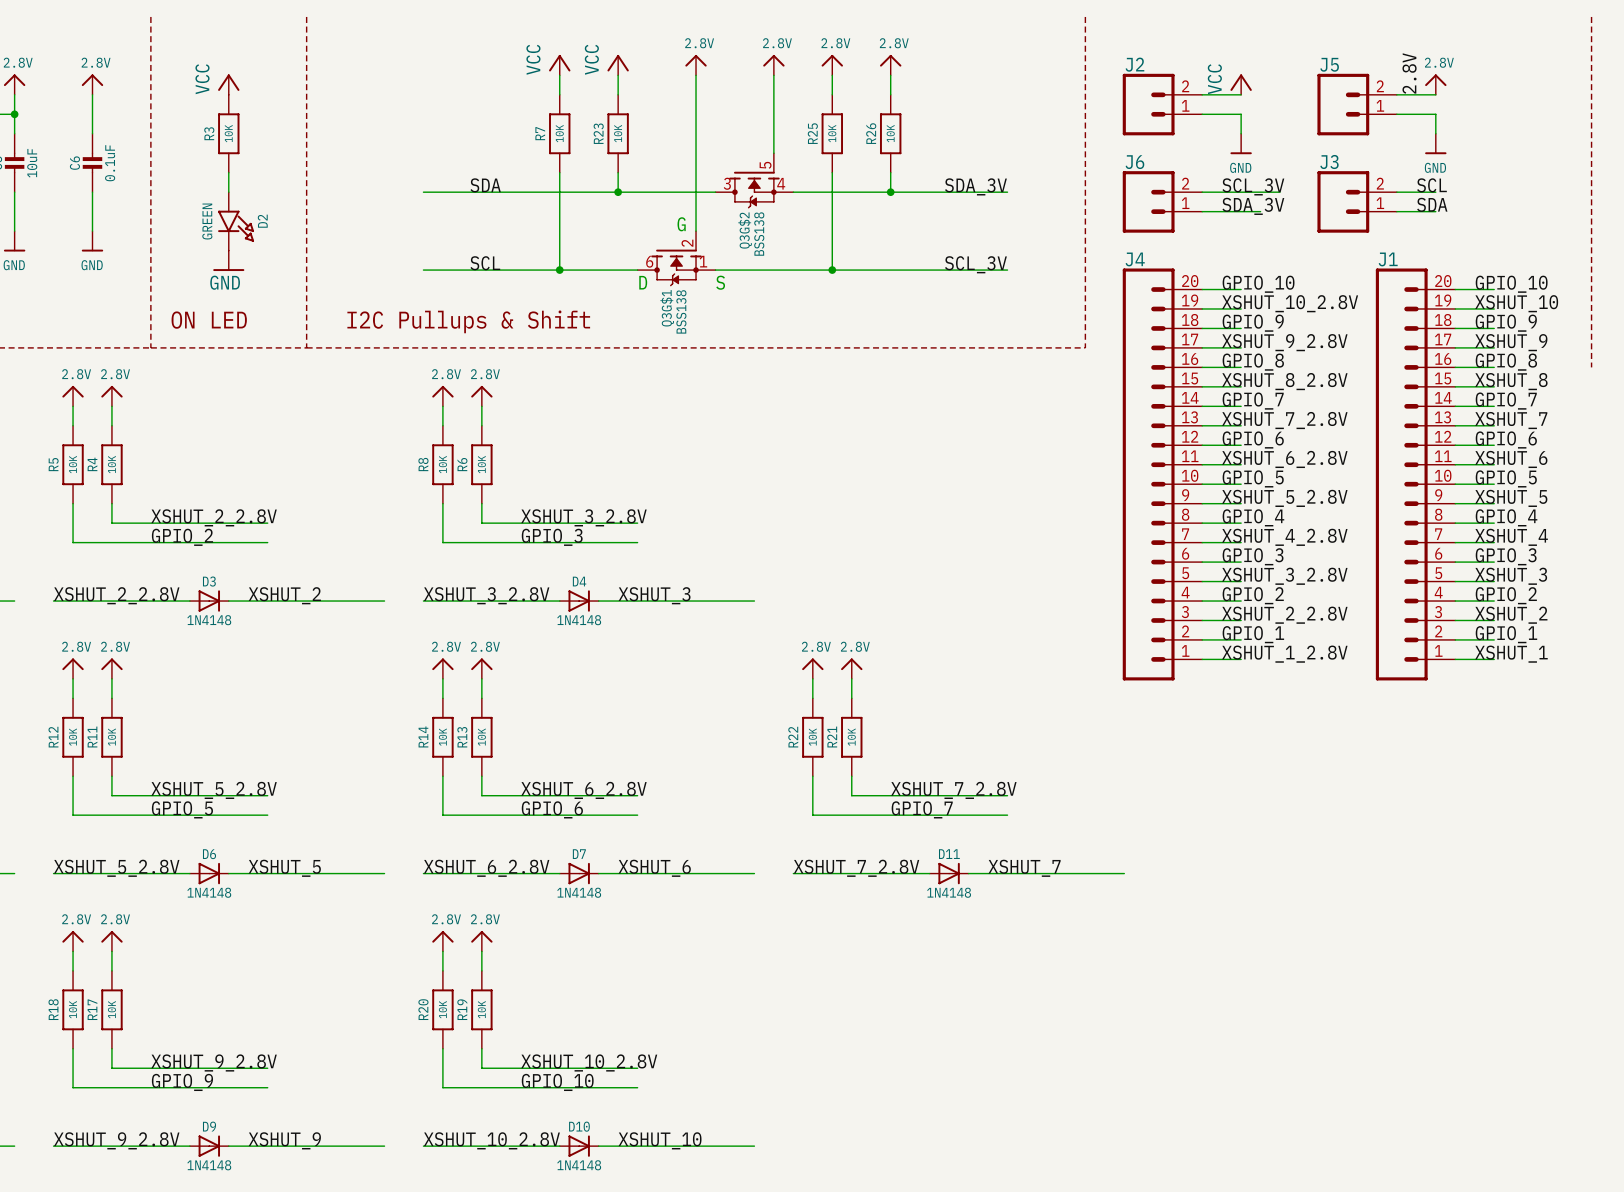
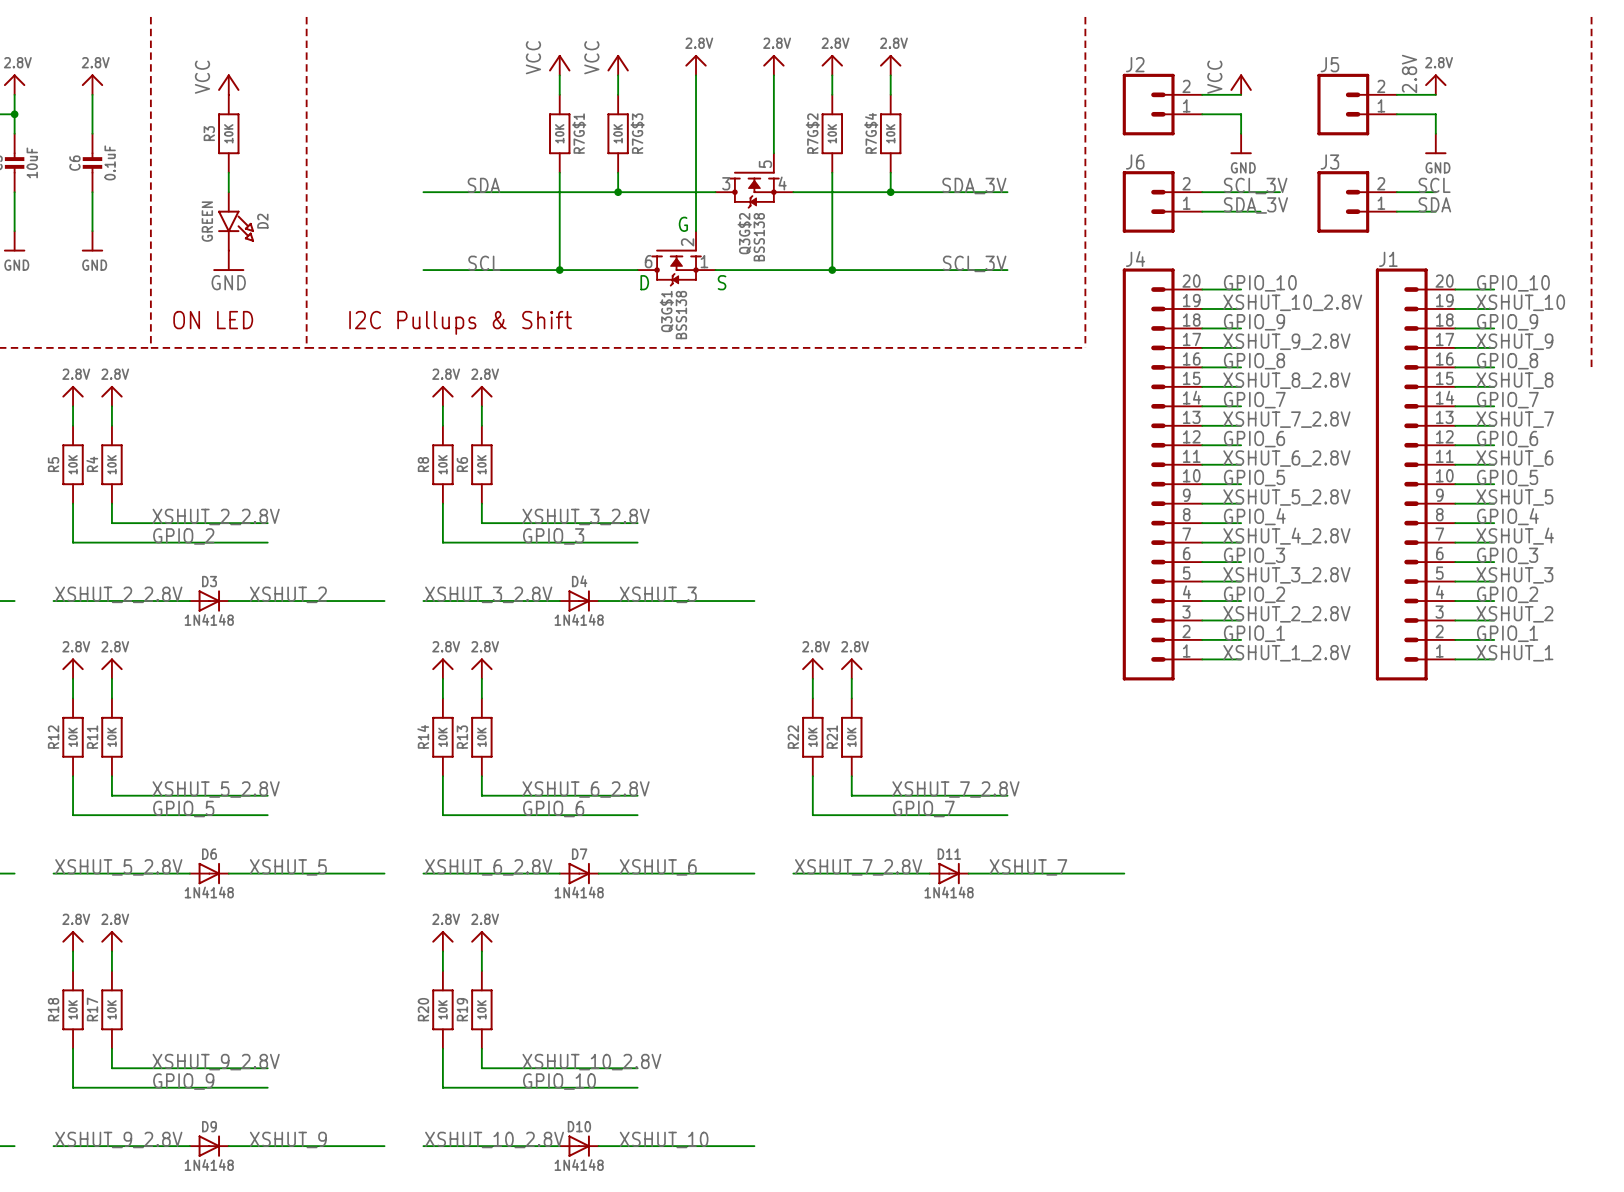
R7 name: R7 (540, 133) -> R7G$1 (579, 133)
R23 name: R23 (598, 133) -> R7G$3 (637, 133)
R25 name: R25 (812, 133) -> R7G$2 (812, 133)
R26 name: R26 (871, 133) -> R7G$4 (871, 133)

